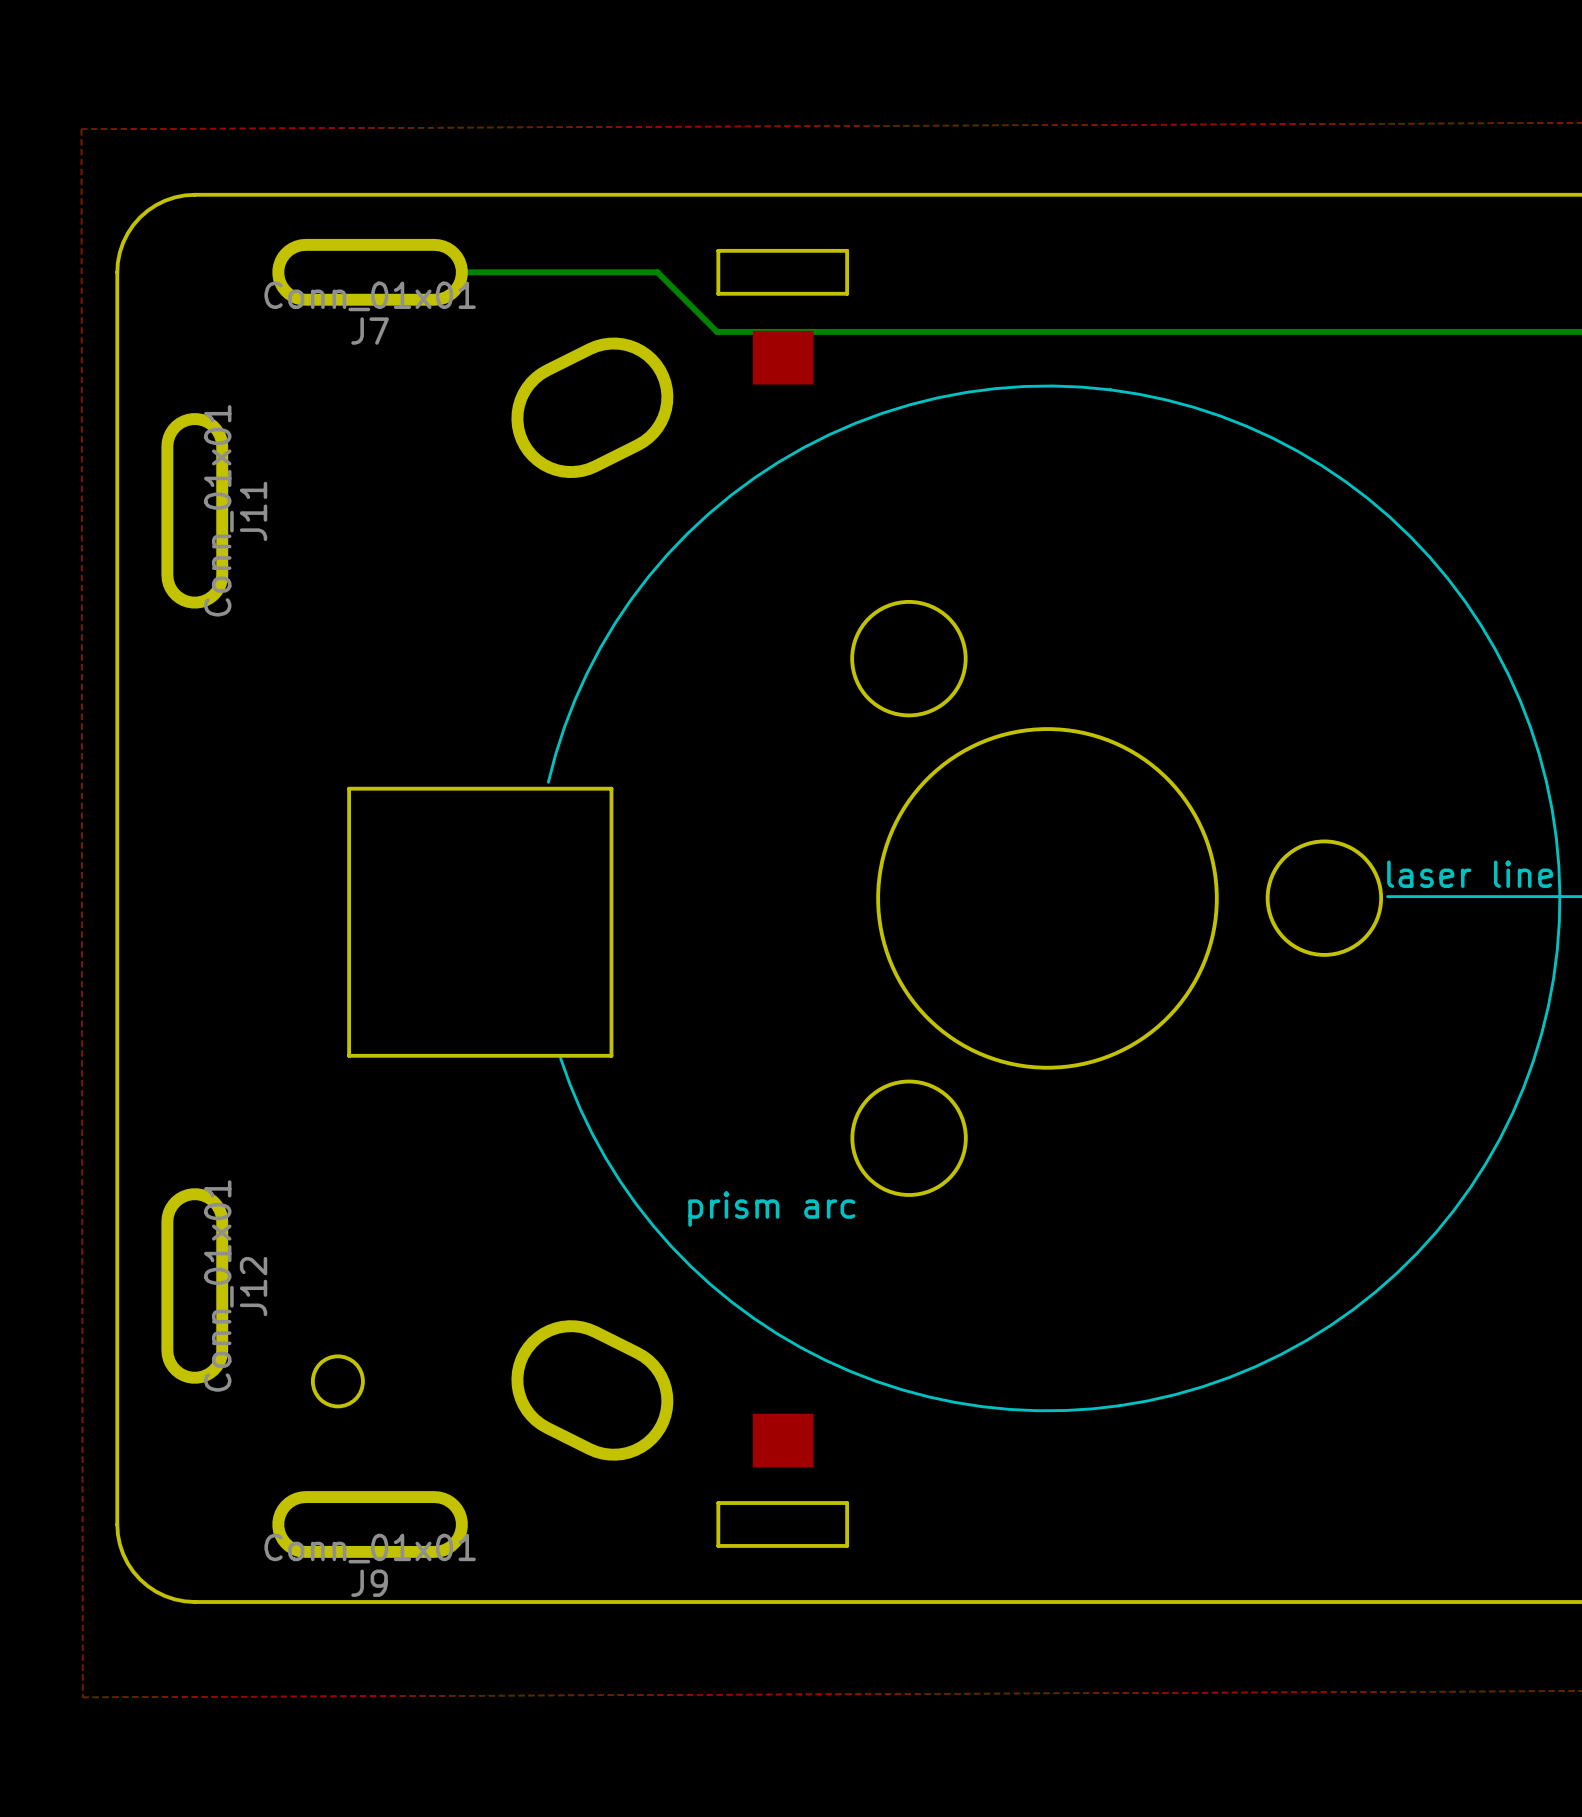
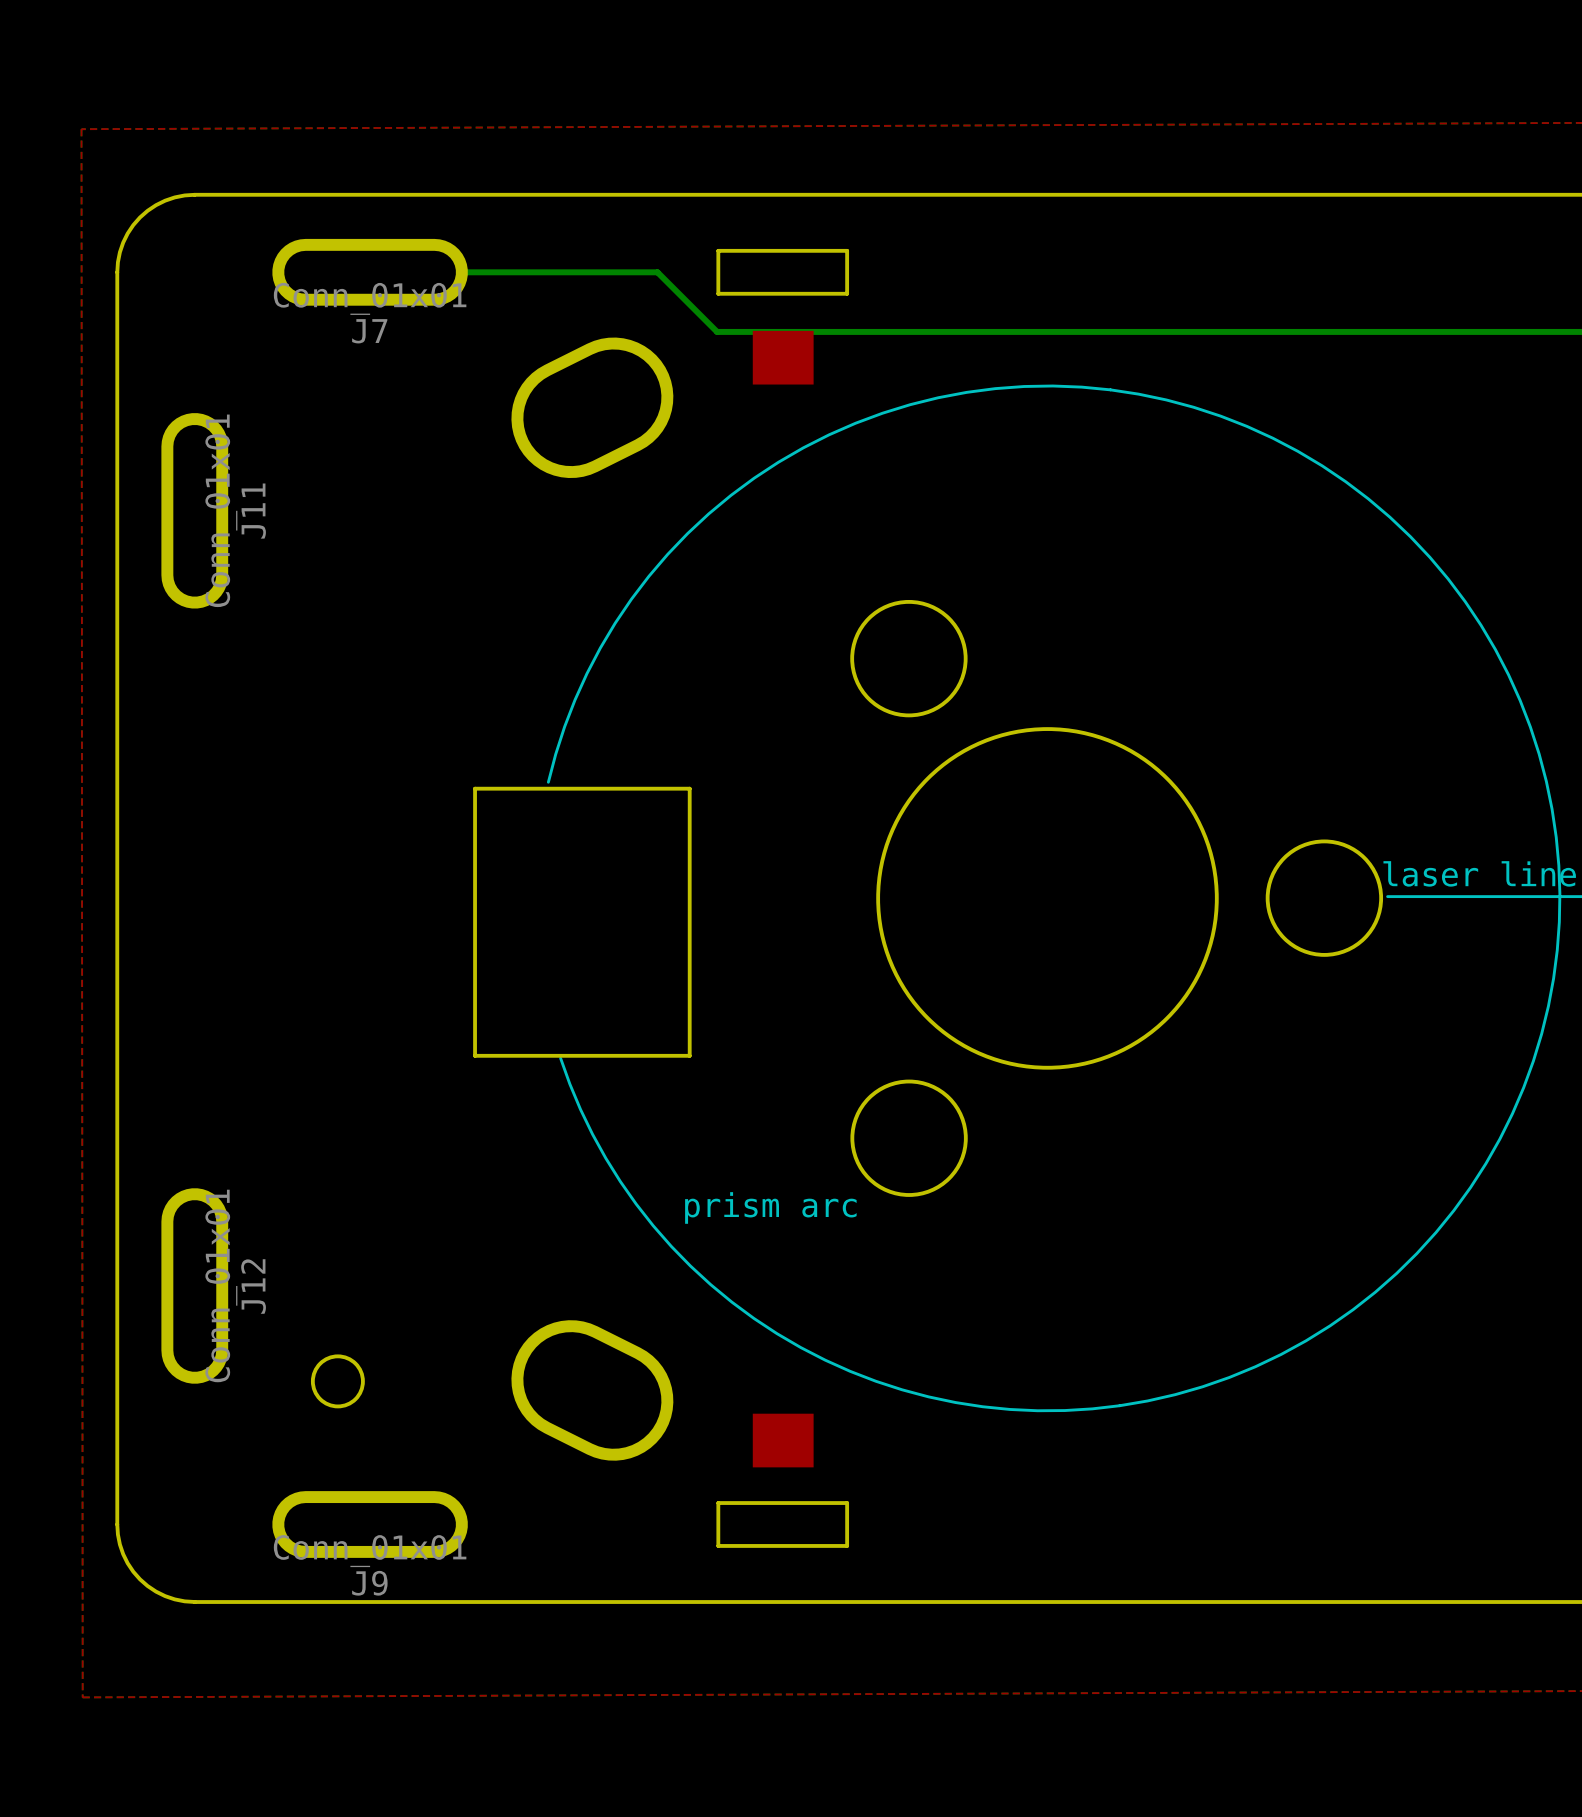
board edge: (475, 788) (349, 788) (349, 1055) (475, 1055) -> (475, 788) (475, 1055)
board edge: (611, 788) (611, 1055) -> (611, 788) (689, 788) (689, 1055) (611, 1055)

